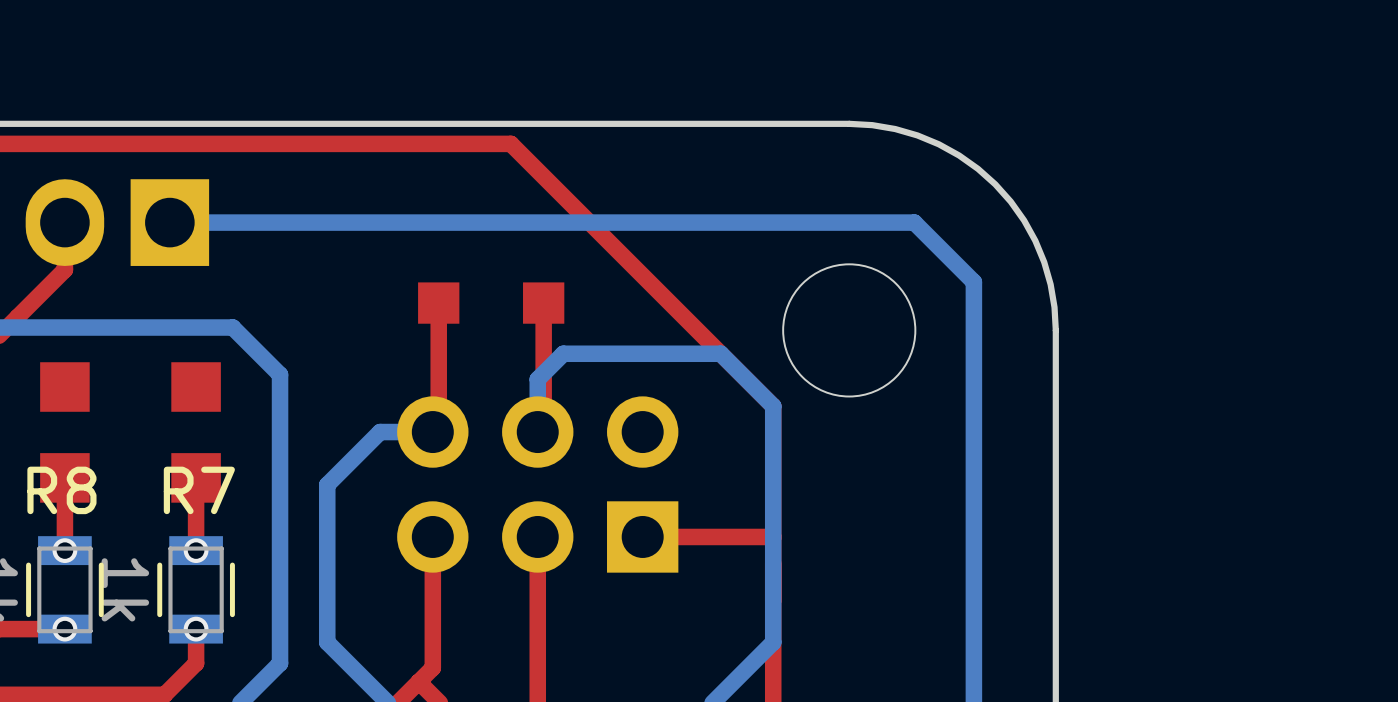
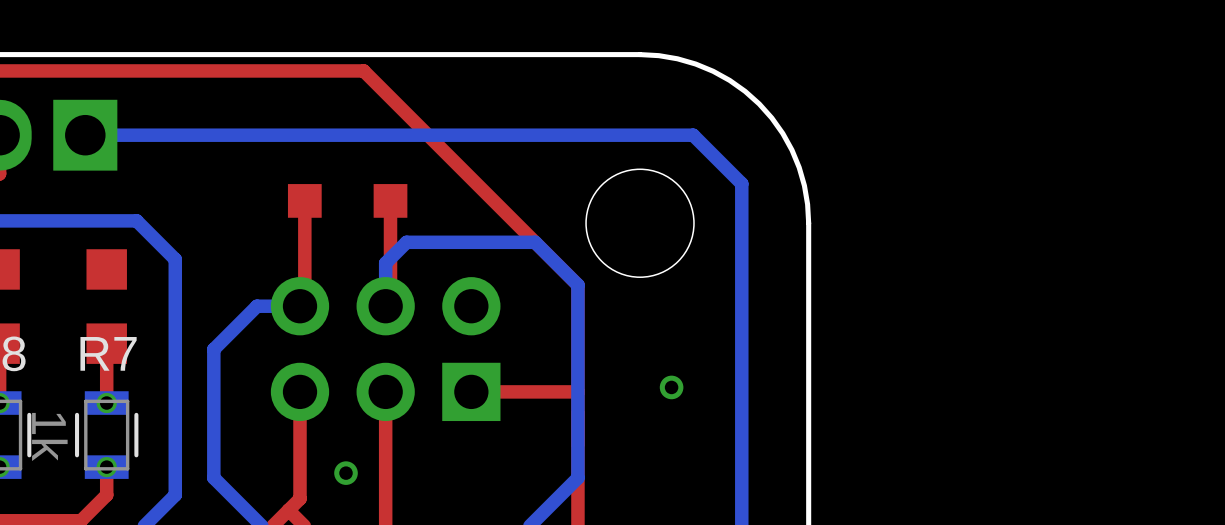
part: none -> (671, 387)
part: none -> (346, 473)

